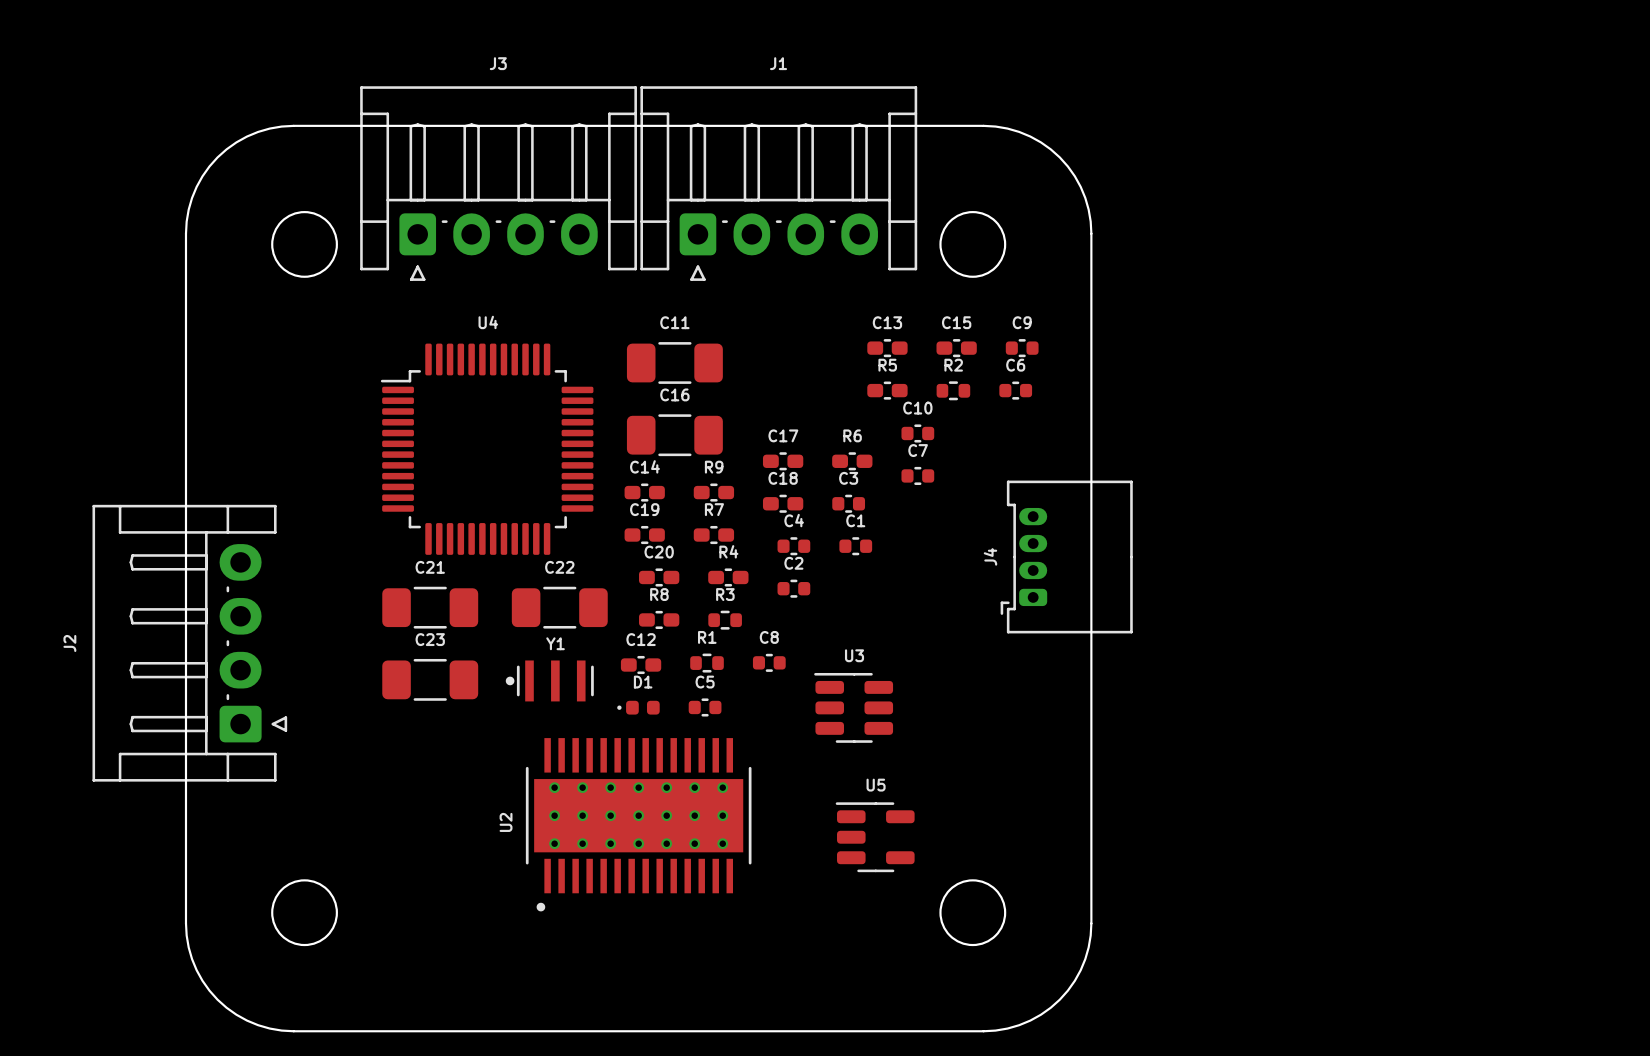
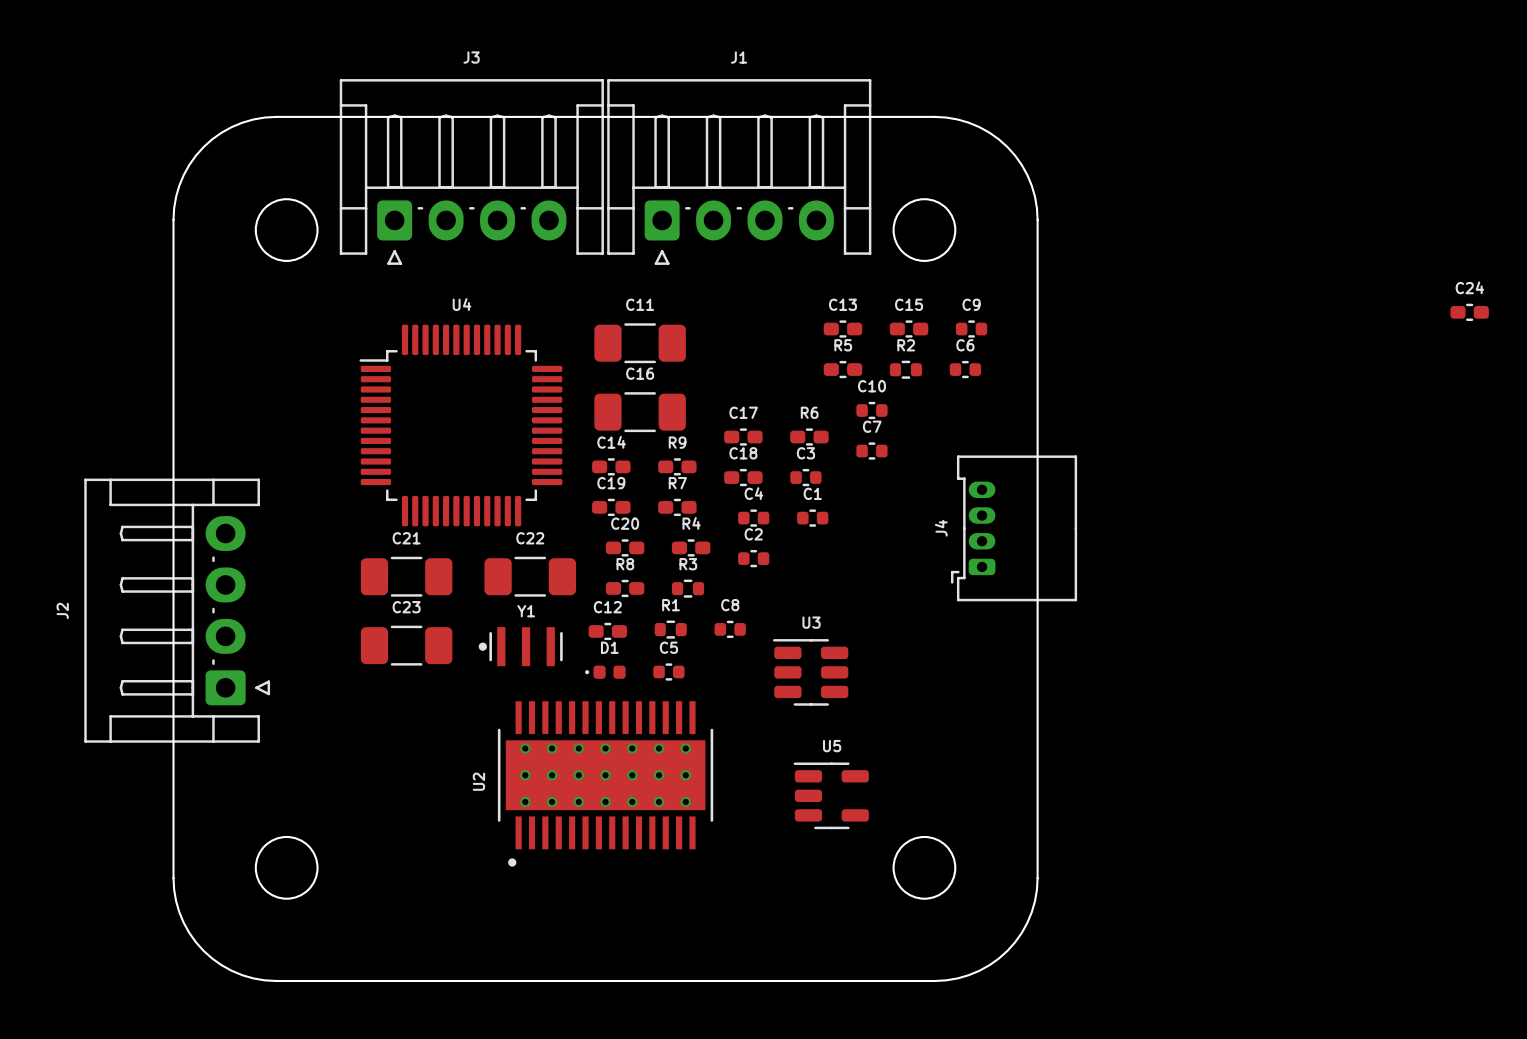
C24: none -> (1469, 312)

